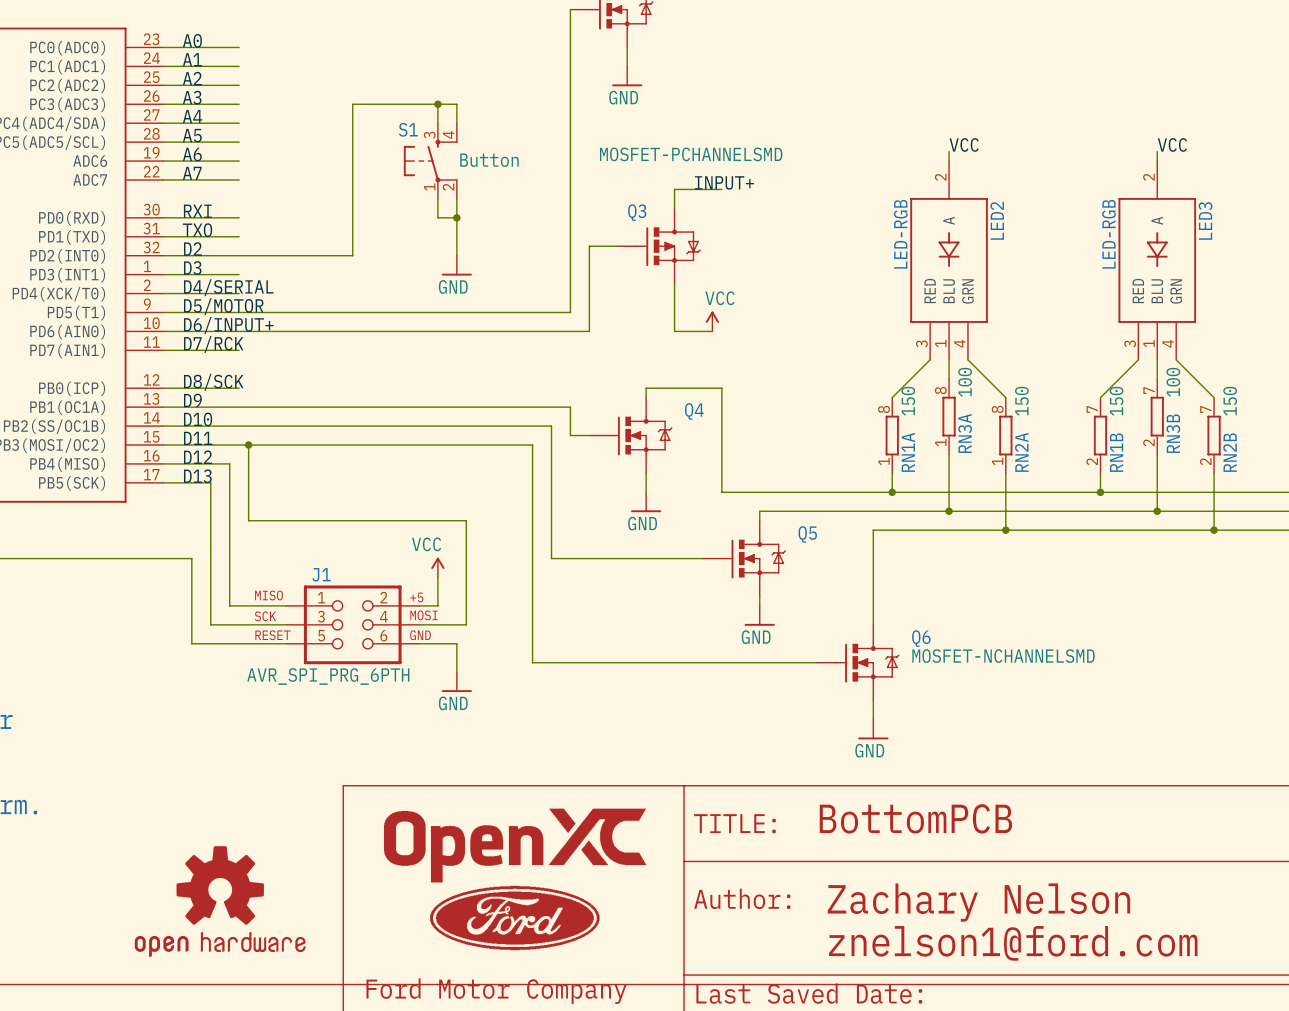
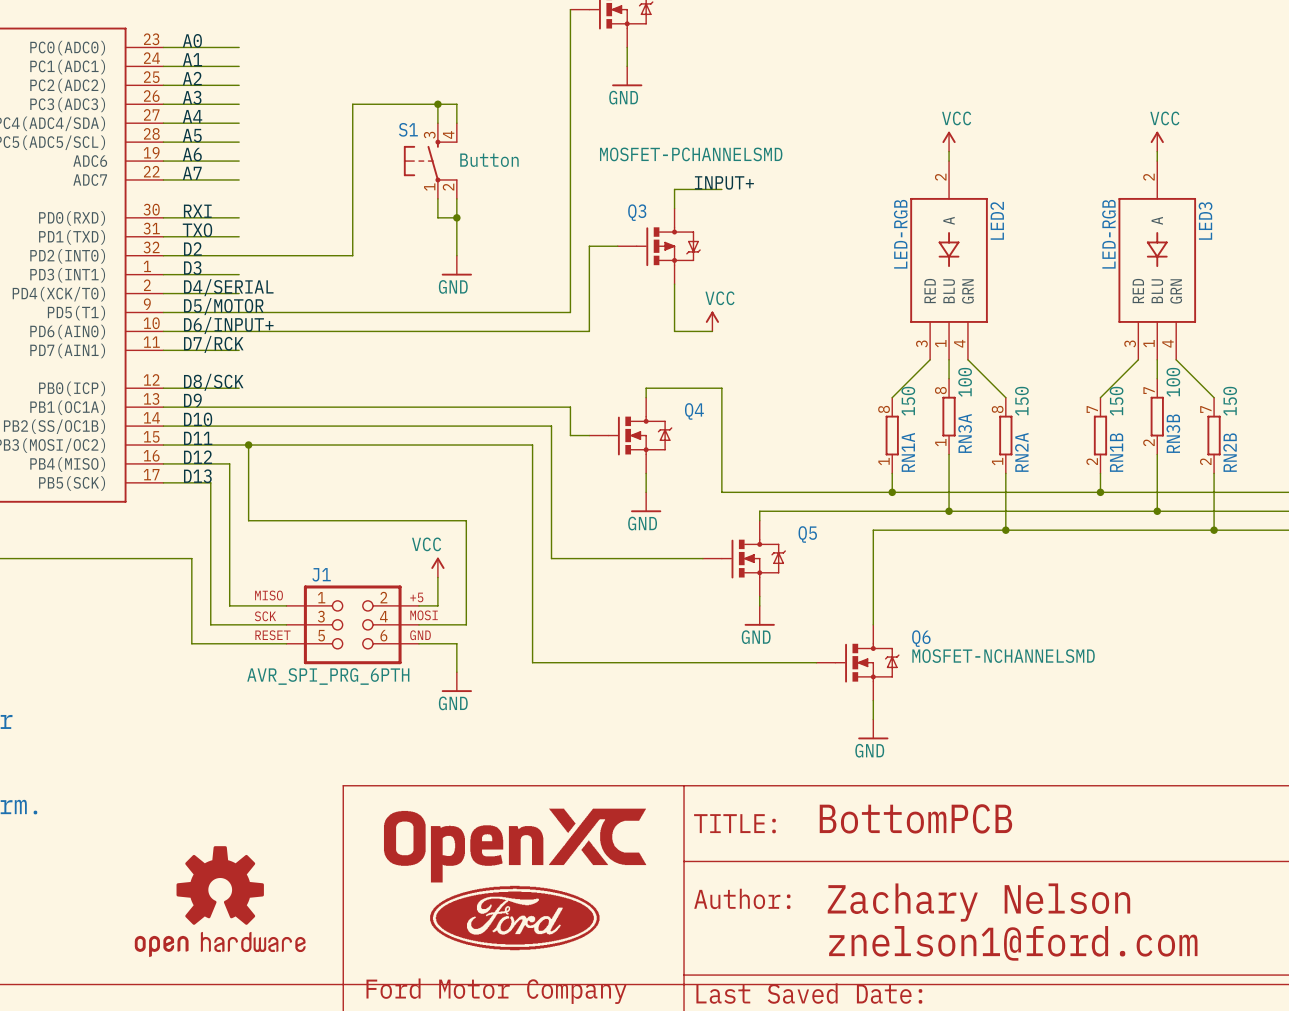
power symbol: none -> VCC (949, 141)
power symbol: none -> VCC (1157, 141)
label: VCC (964, 144) -> none
label: VCC (1172, 144) -> none

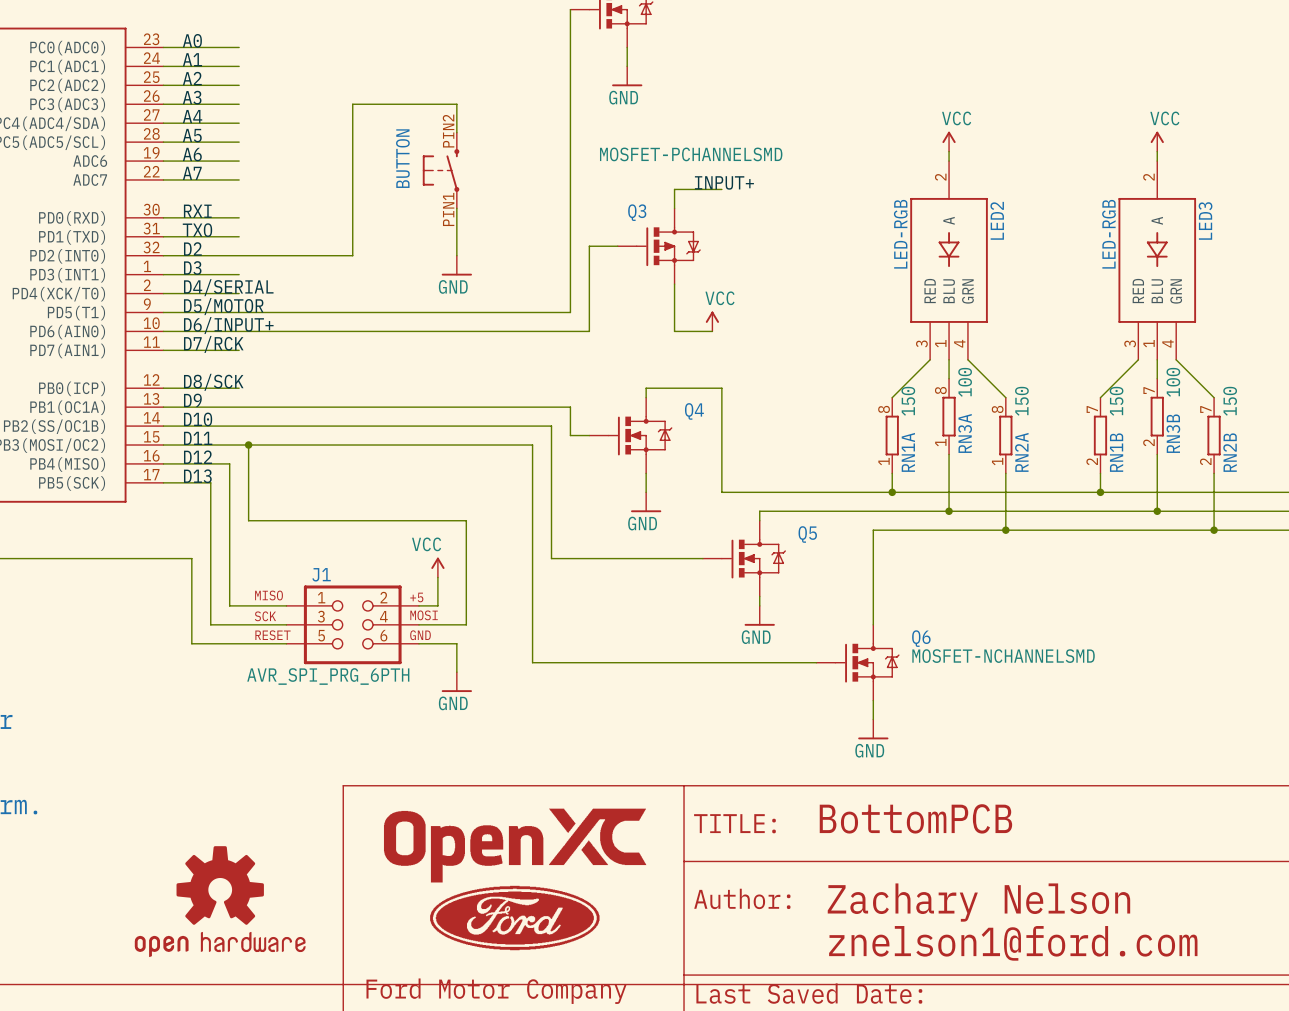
wire: (437, 104) (437, 123) -> none
junction: (437, 104) -> none
S1: Button (430, 161) -> none
BUTTON: none -> (441, 170)
wire: (437, 198) (437, 217) (456, 217) -> none
junction: (456, 217) -> none

